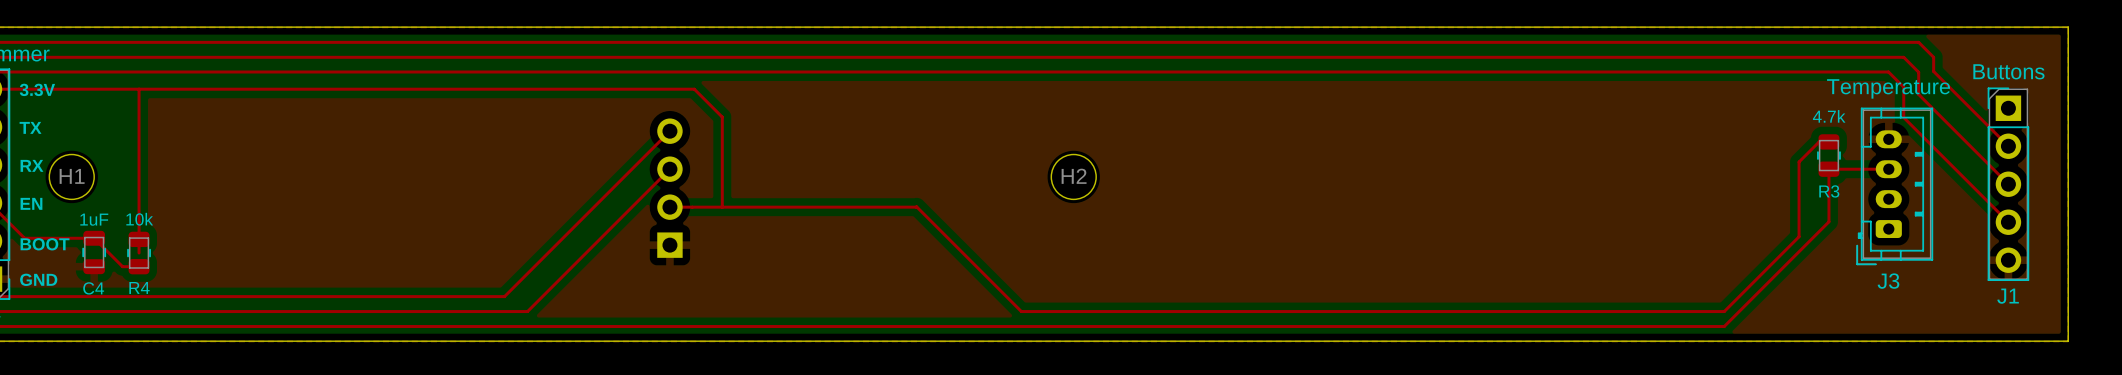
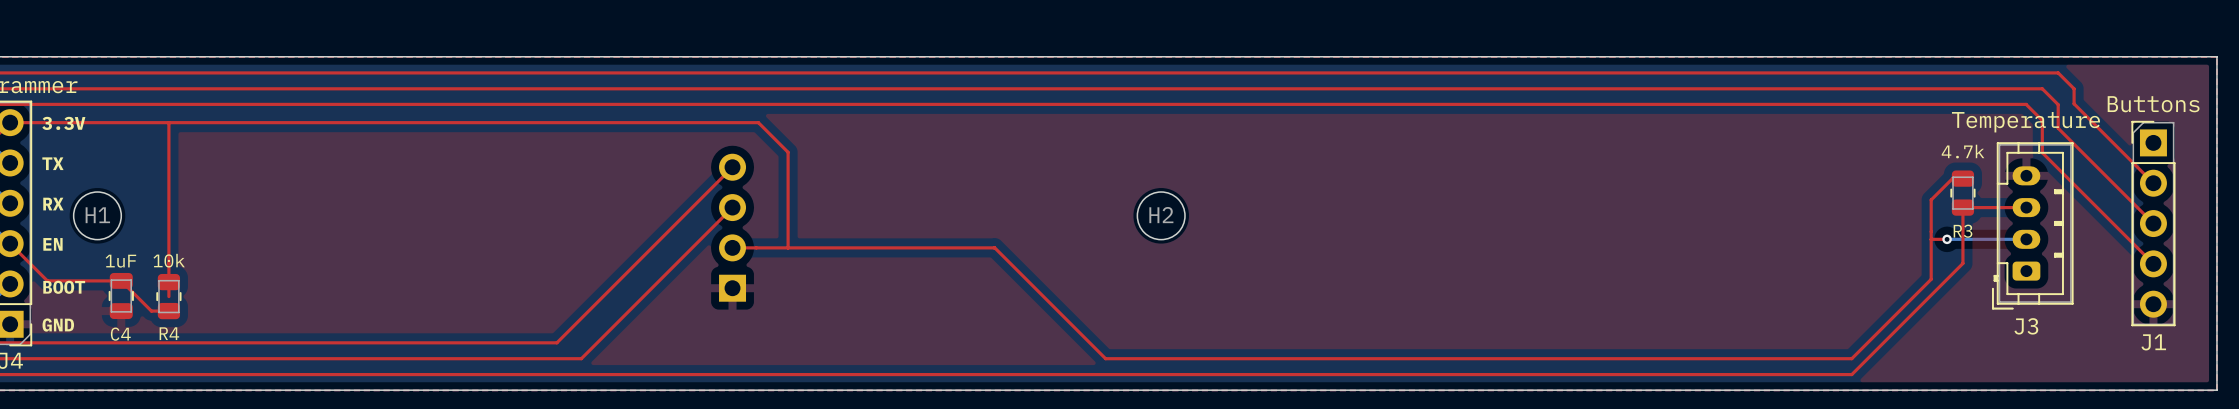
top track: none -> (1931, 239) (1947, 239)
bottom track: none -> (1947, 239) (2026, 239)
via: none -> (1947, 239)

